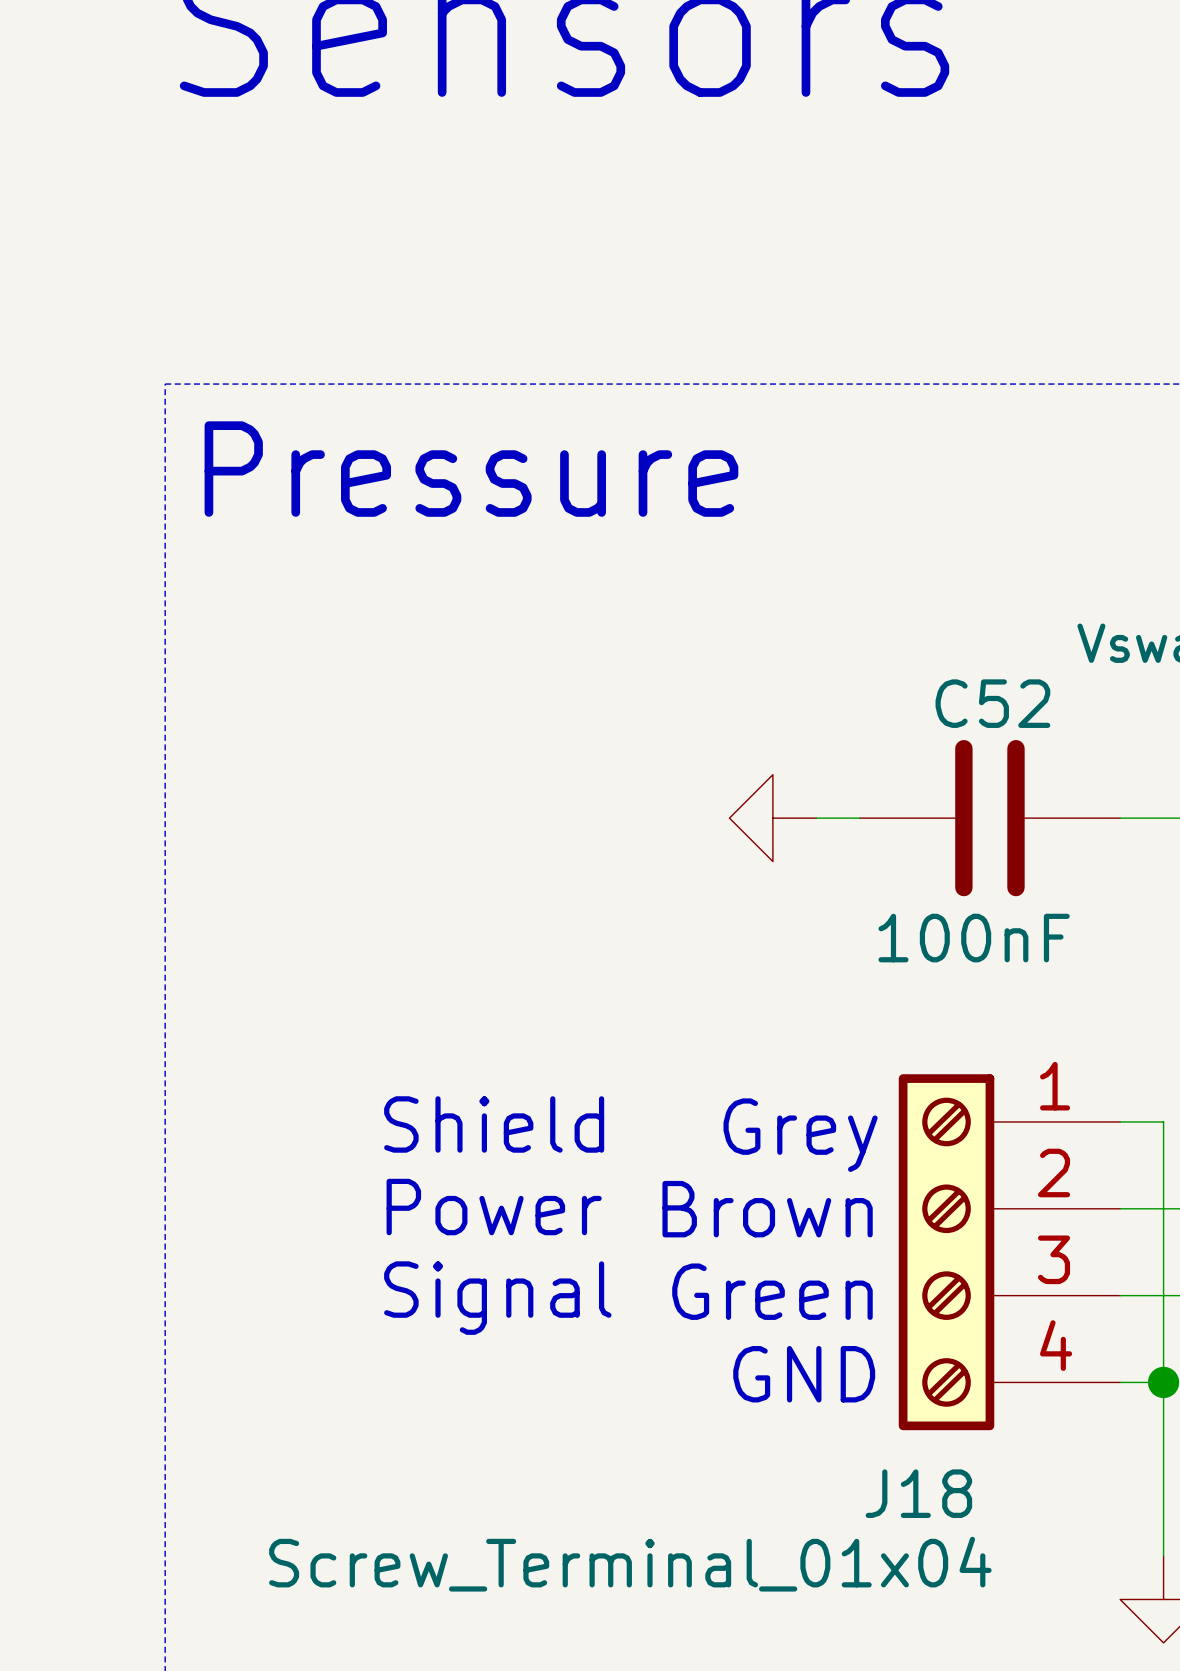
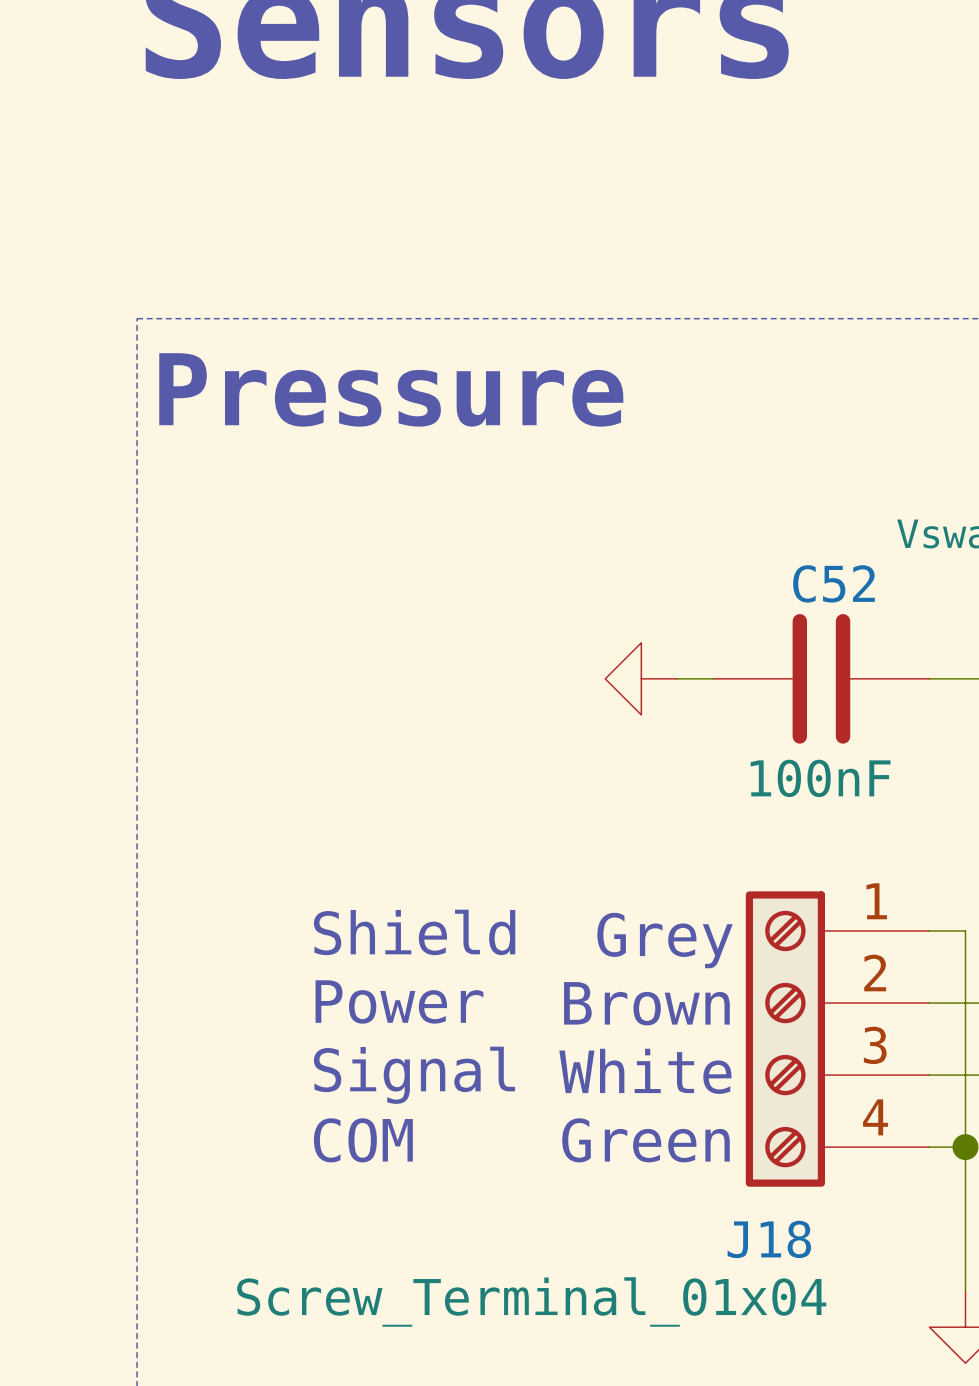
text: Green (772, 1291) -> White (645, 1071)
text: none -> COM (363, 1140)
text: GND (804, 1374) -> Green (646, 1140)

